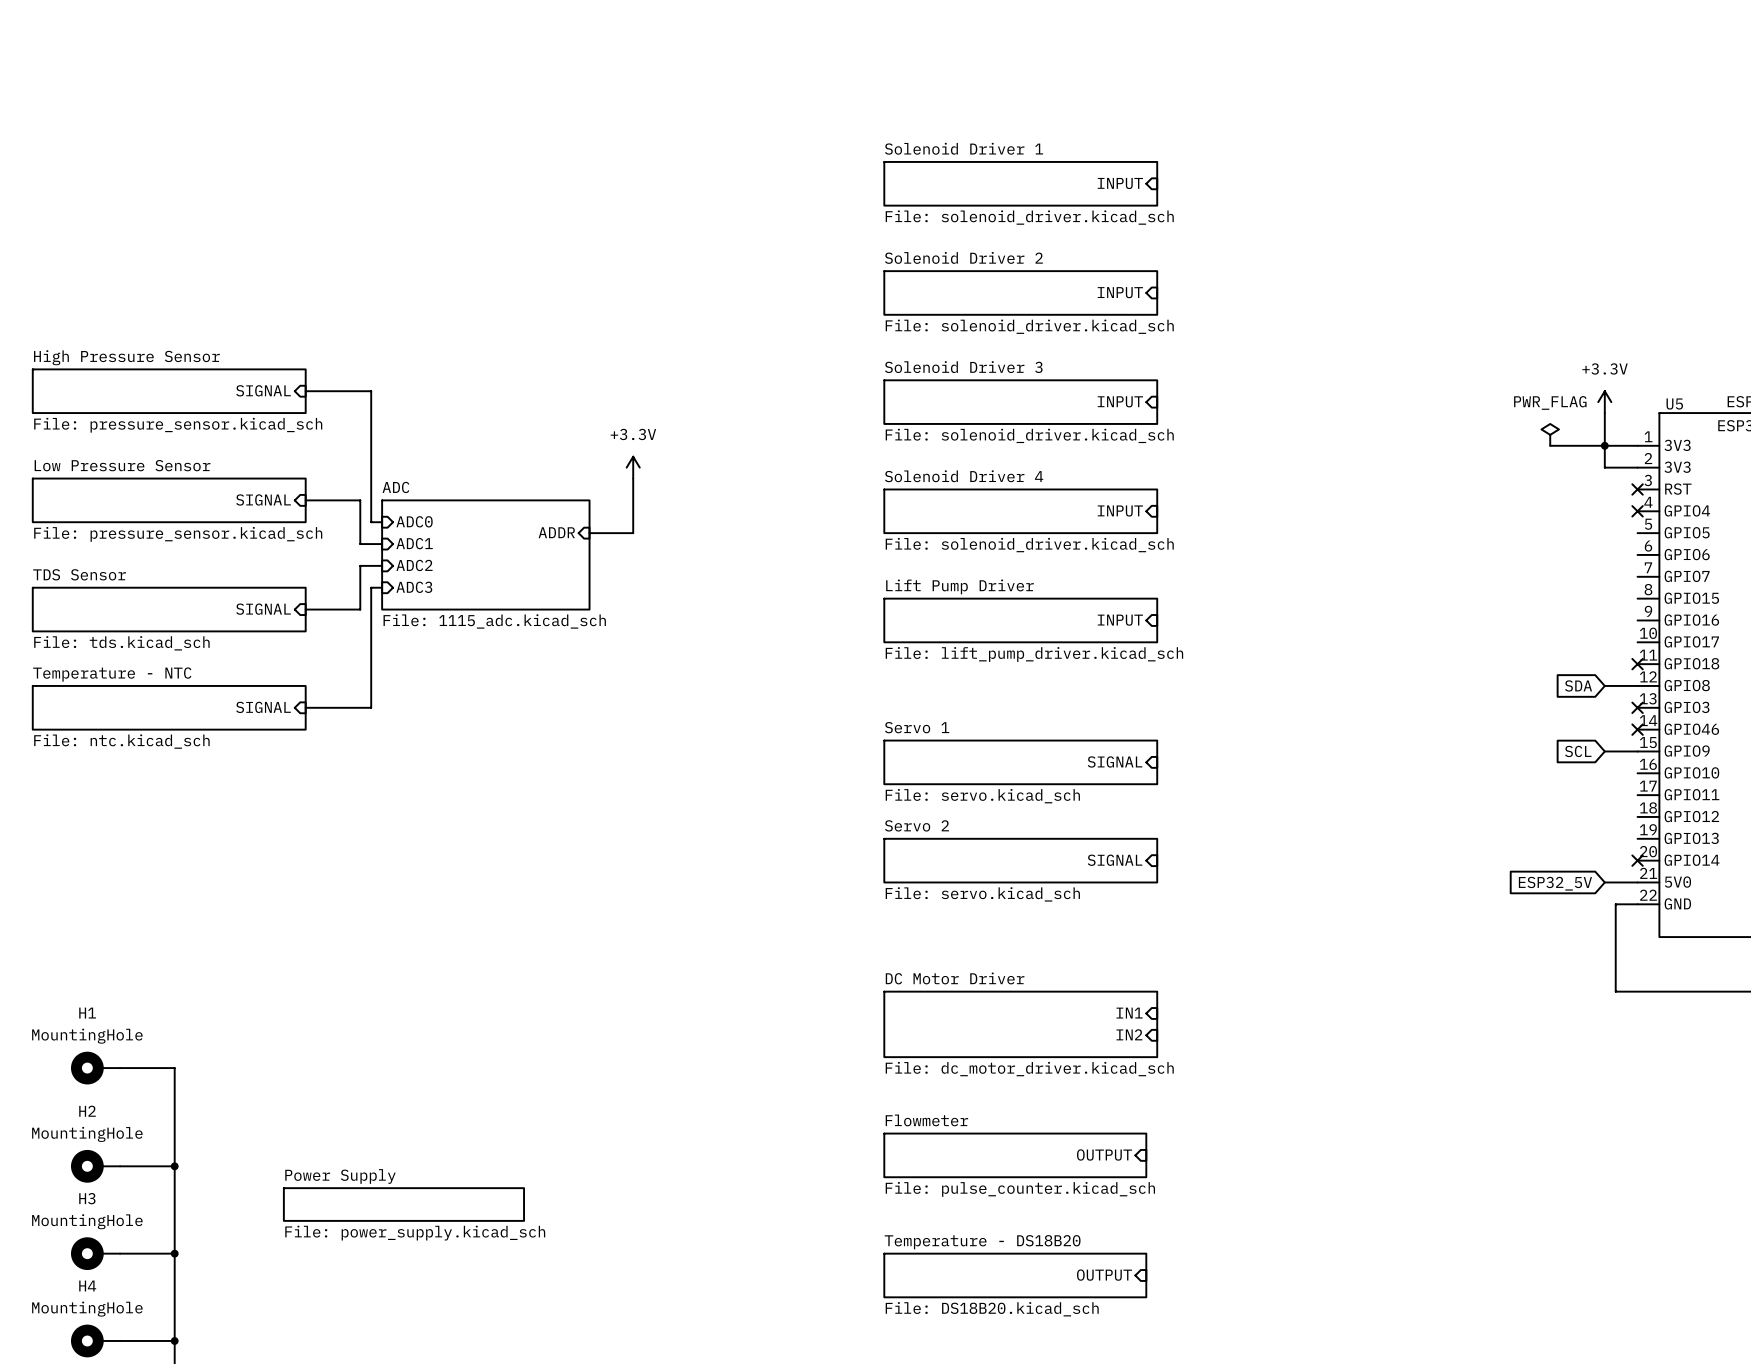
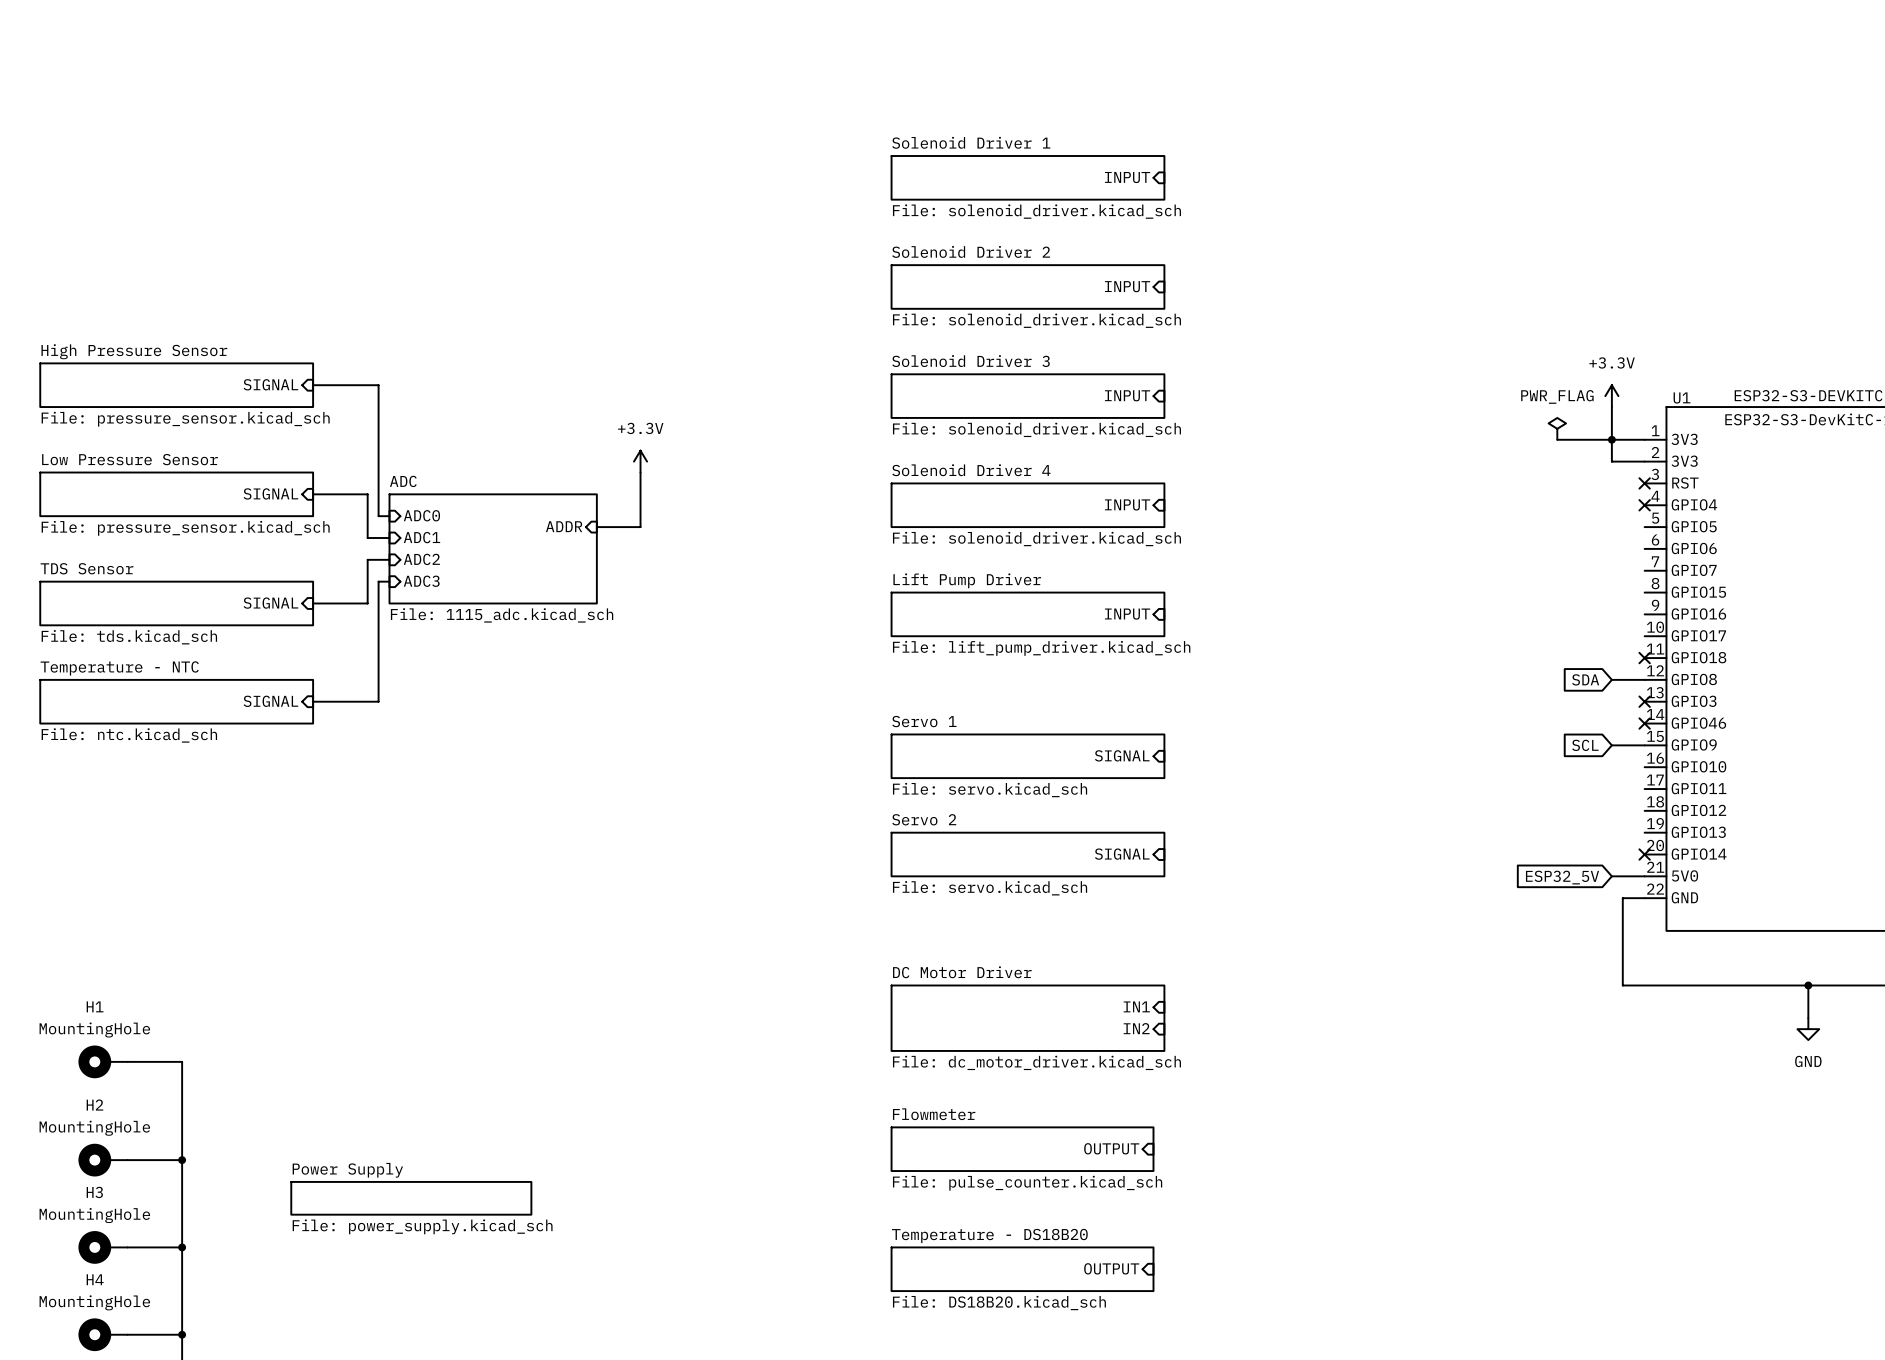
U5 name: U5 (1674, 404) -> U1 (1682, 397)

